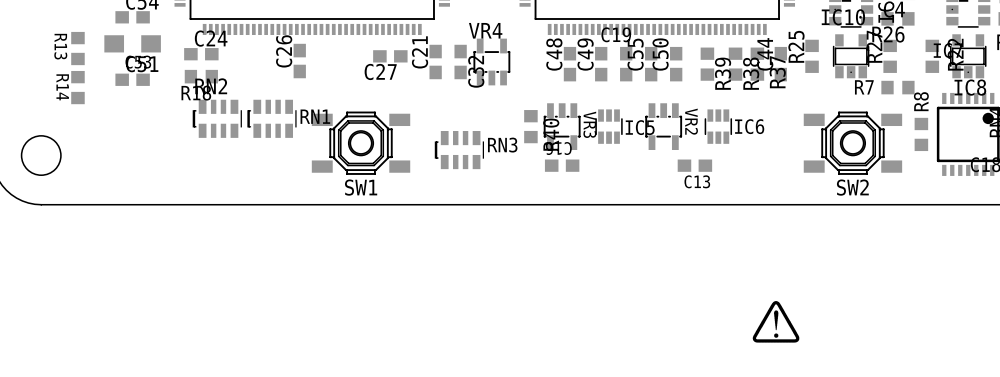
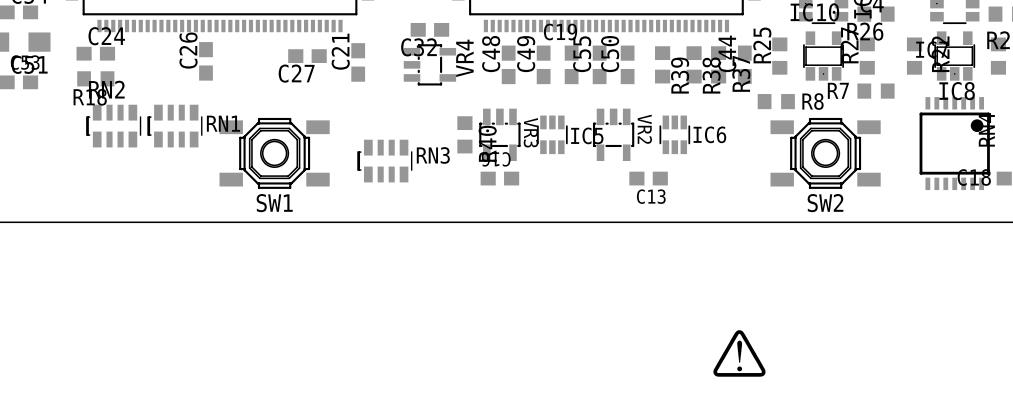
C32 rotation: 0° (460, 62) -> 90° clockwise (429, 29)
C32 position: (460, 62) -> (429, 29)
VR4 rotation: 0° (491, 62) -> 90° clockwise (429, 64)
R8 rotation: 0° (921, 134) -> 90° clockwise (776, 101)
R8 position: (921, 134) -> (776, 101)

